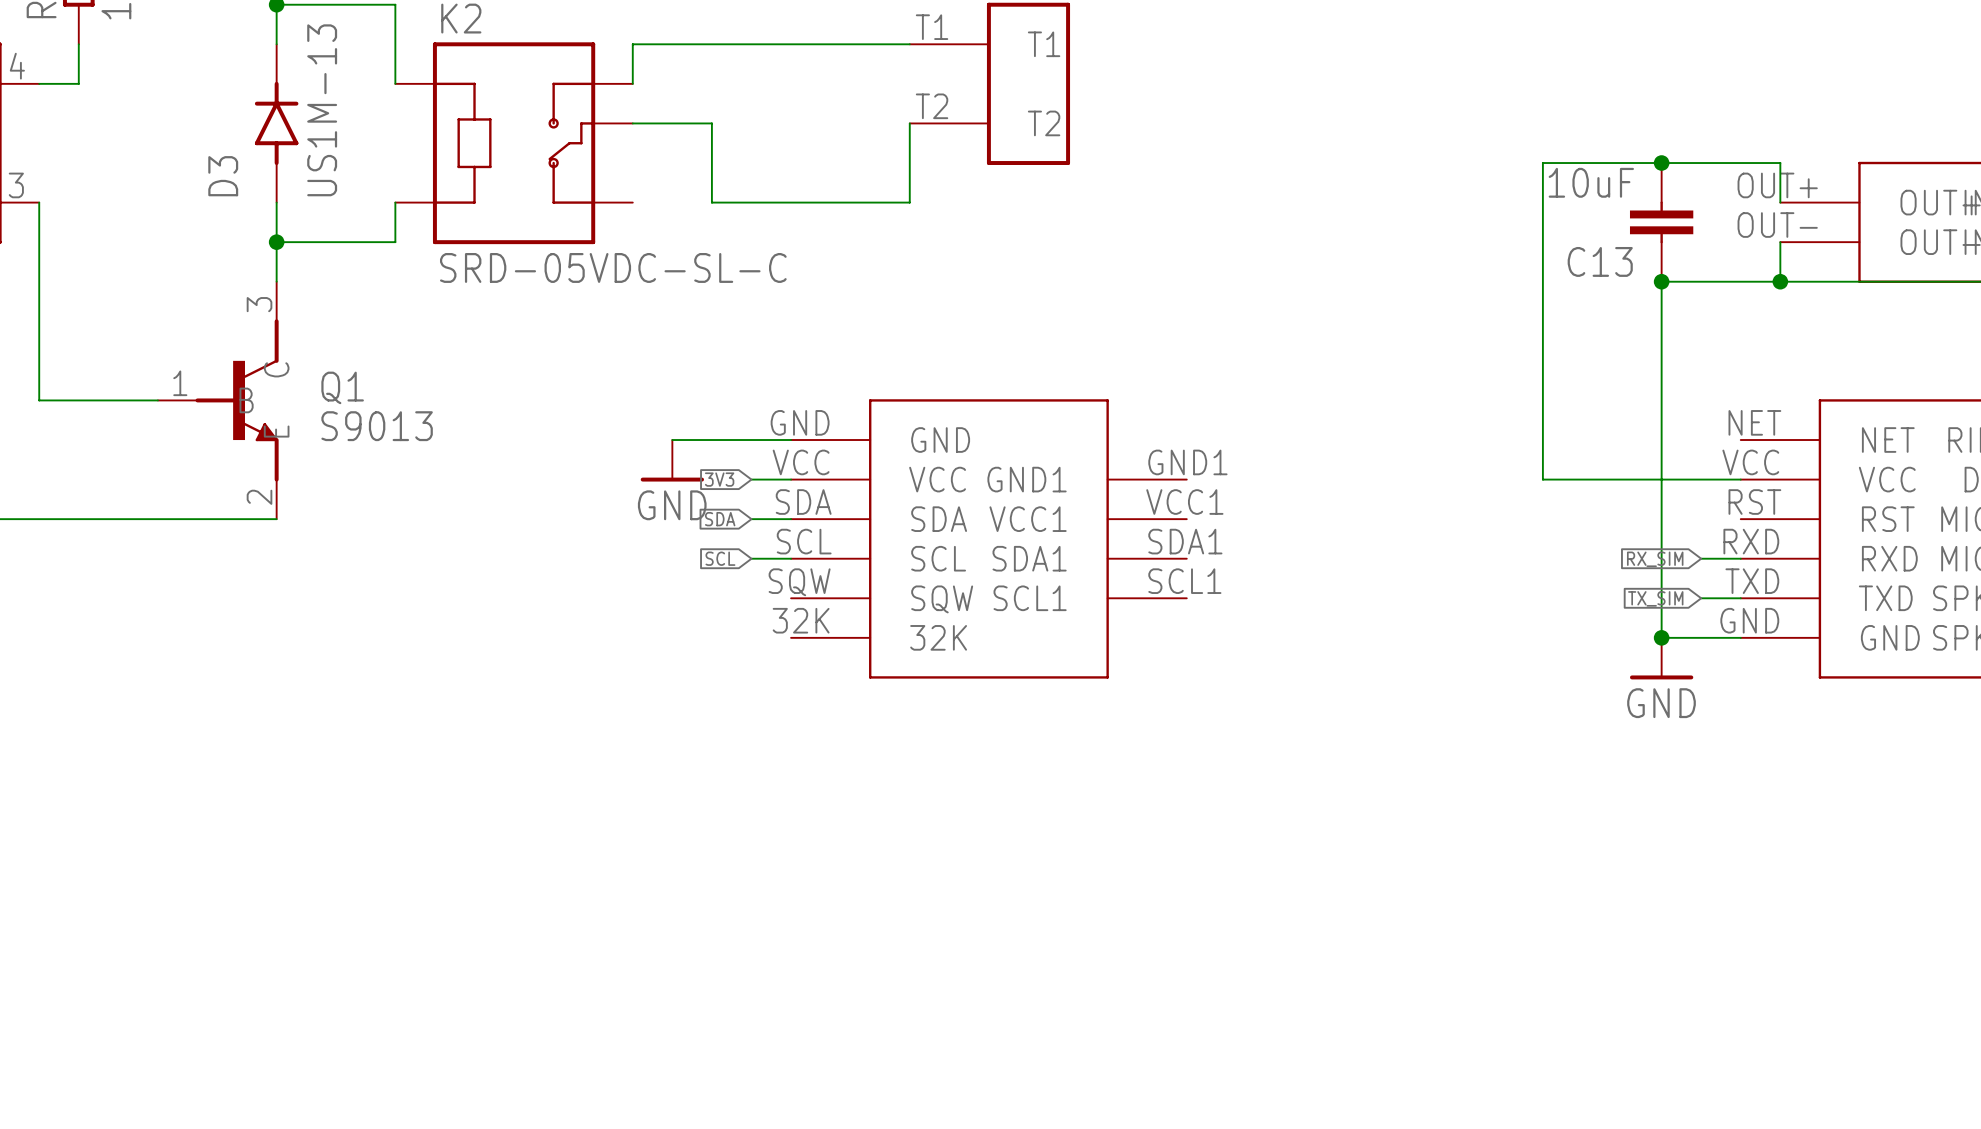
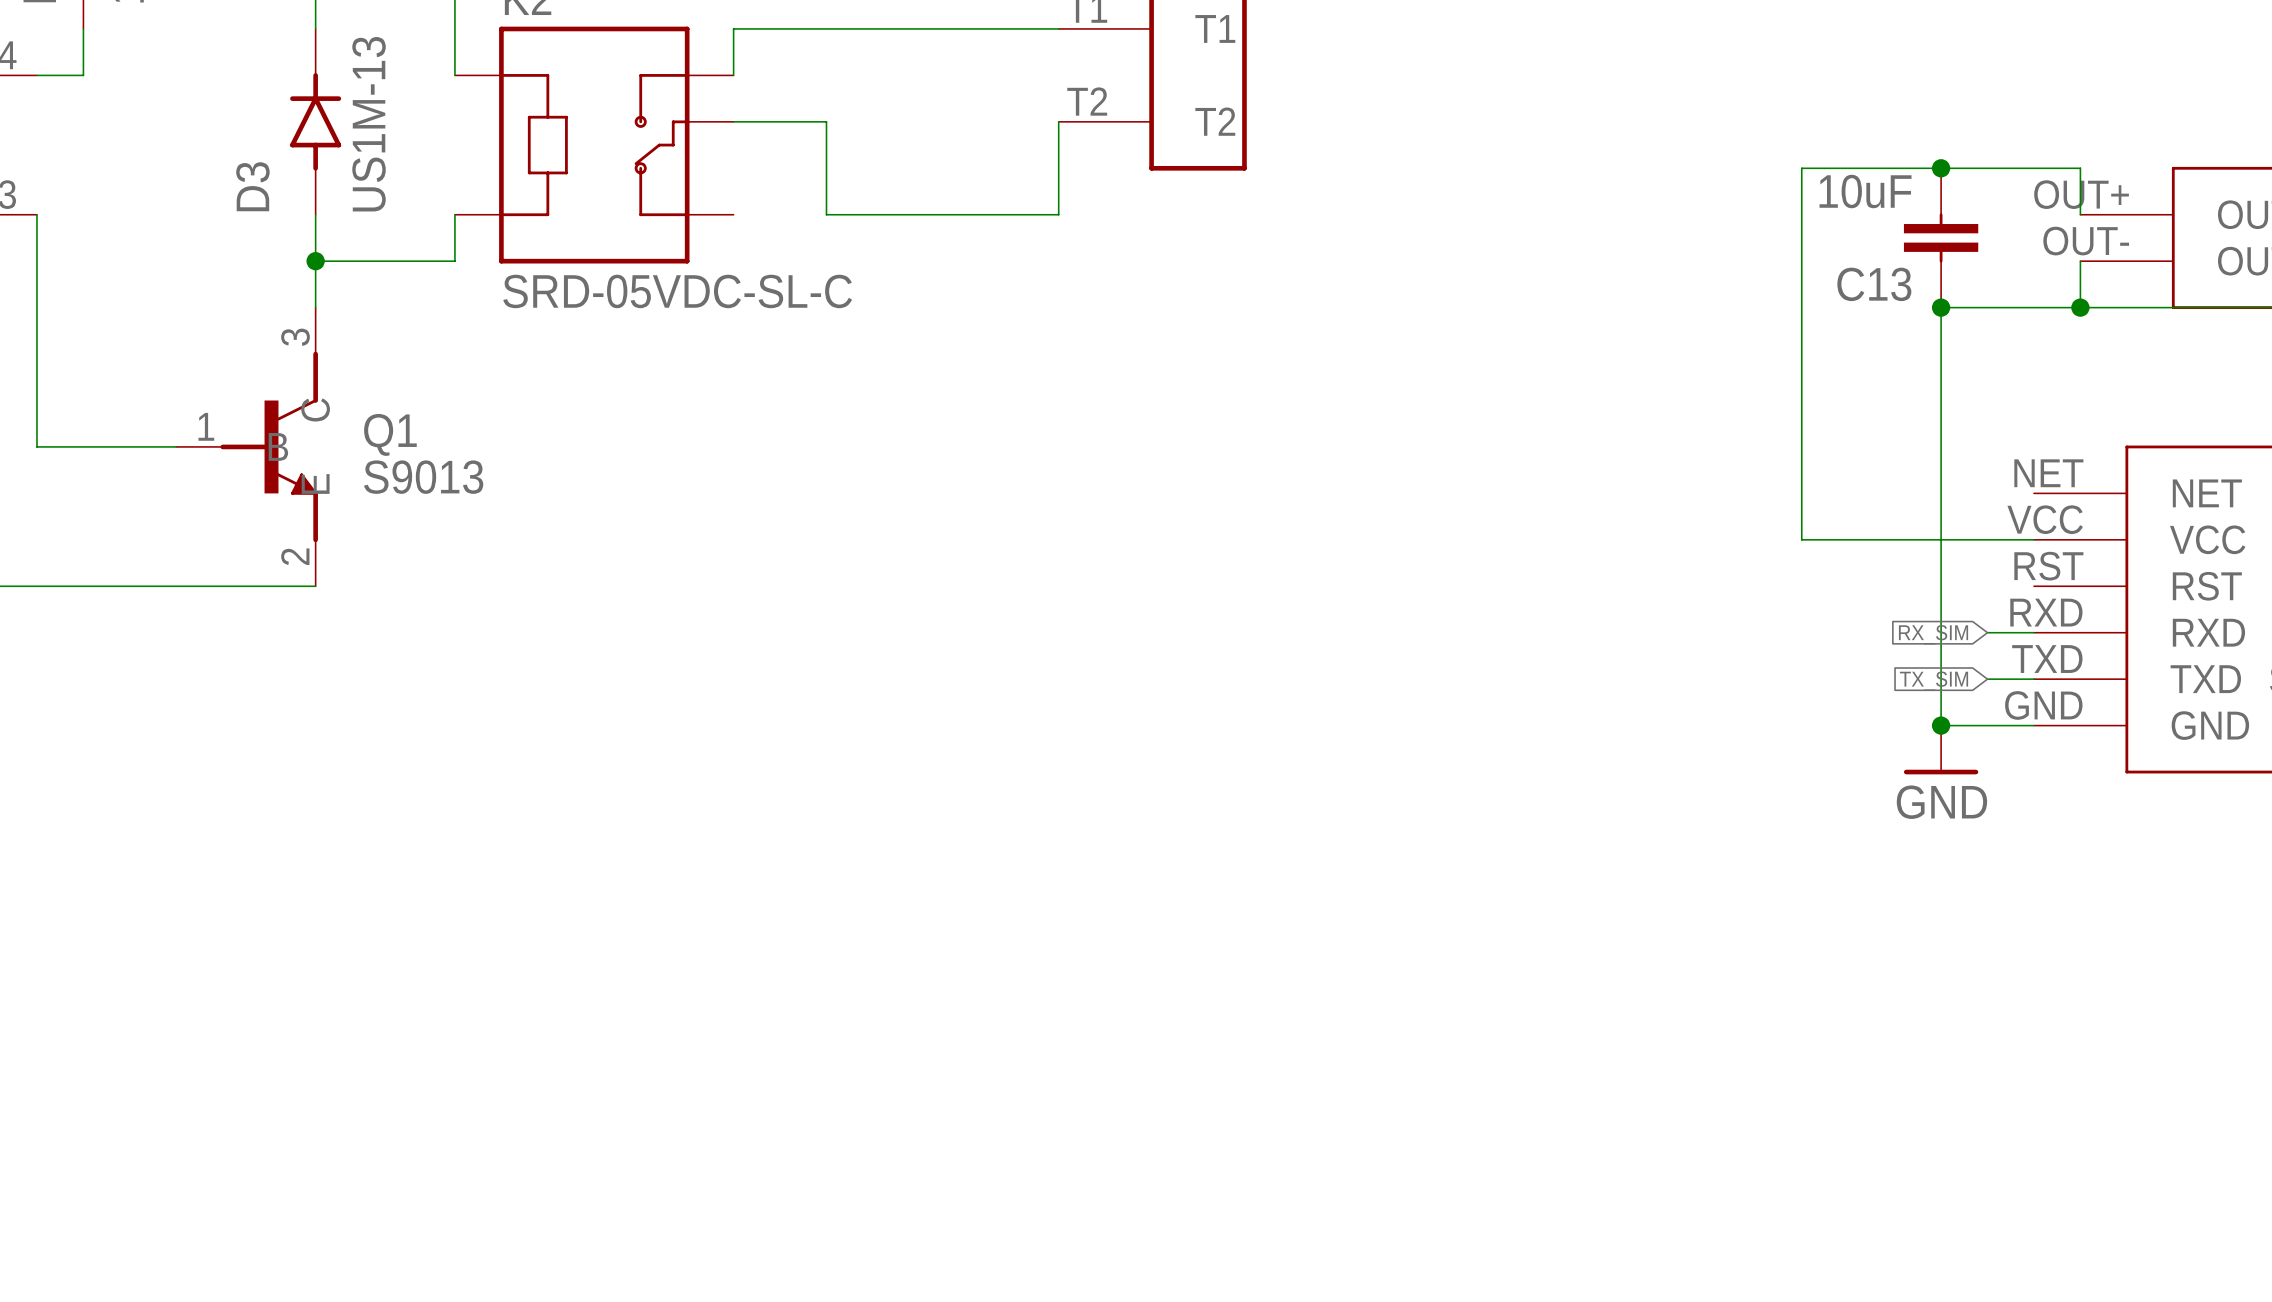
wire: (672, 440) (791, 440) -> none
power symbol: GND (672, 460) -> none
global label: 3V3 (719, 479) -> none
wire: (751, 479) (791, 479) -> none
global label: SDA (720, 519) -> none
wire: (751, 519) (791, 519) -> none
part: (988, 538) -> none
global label: SCL (720, 558) -> none
wire: (751, 558) (791, 558) -> none

